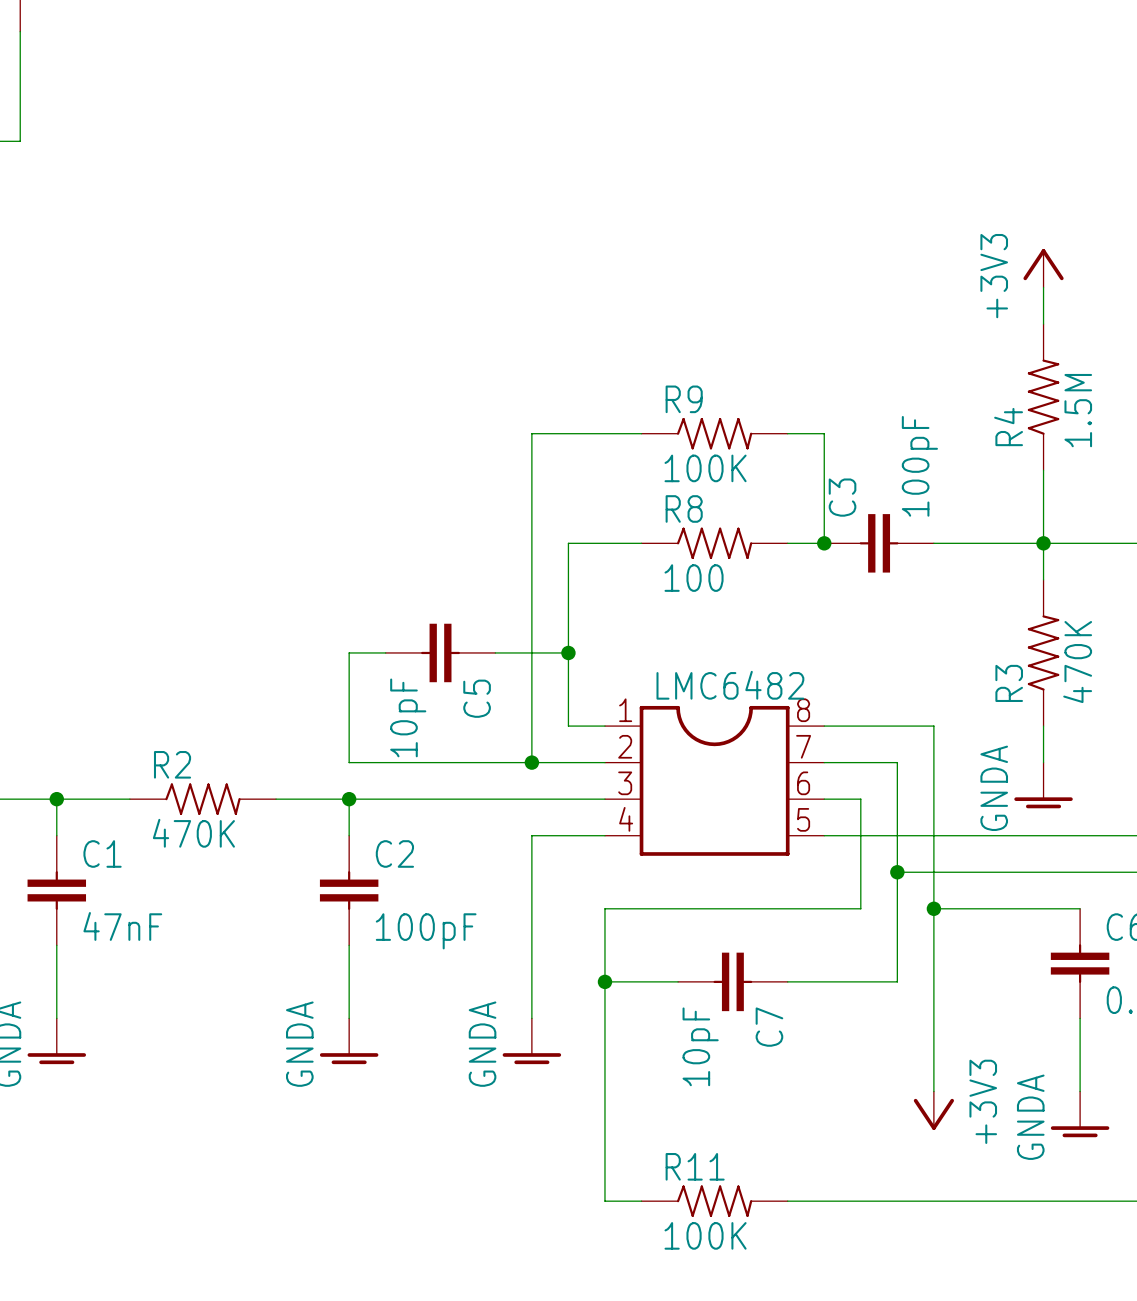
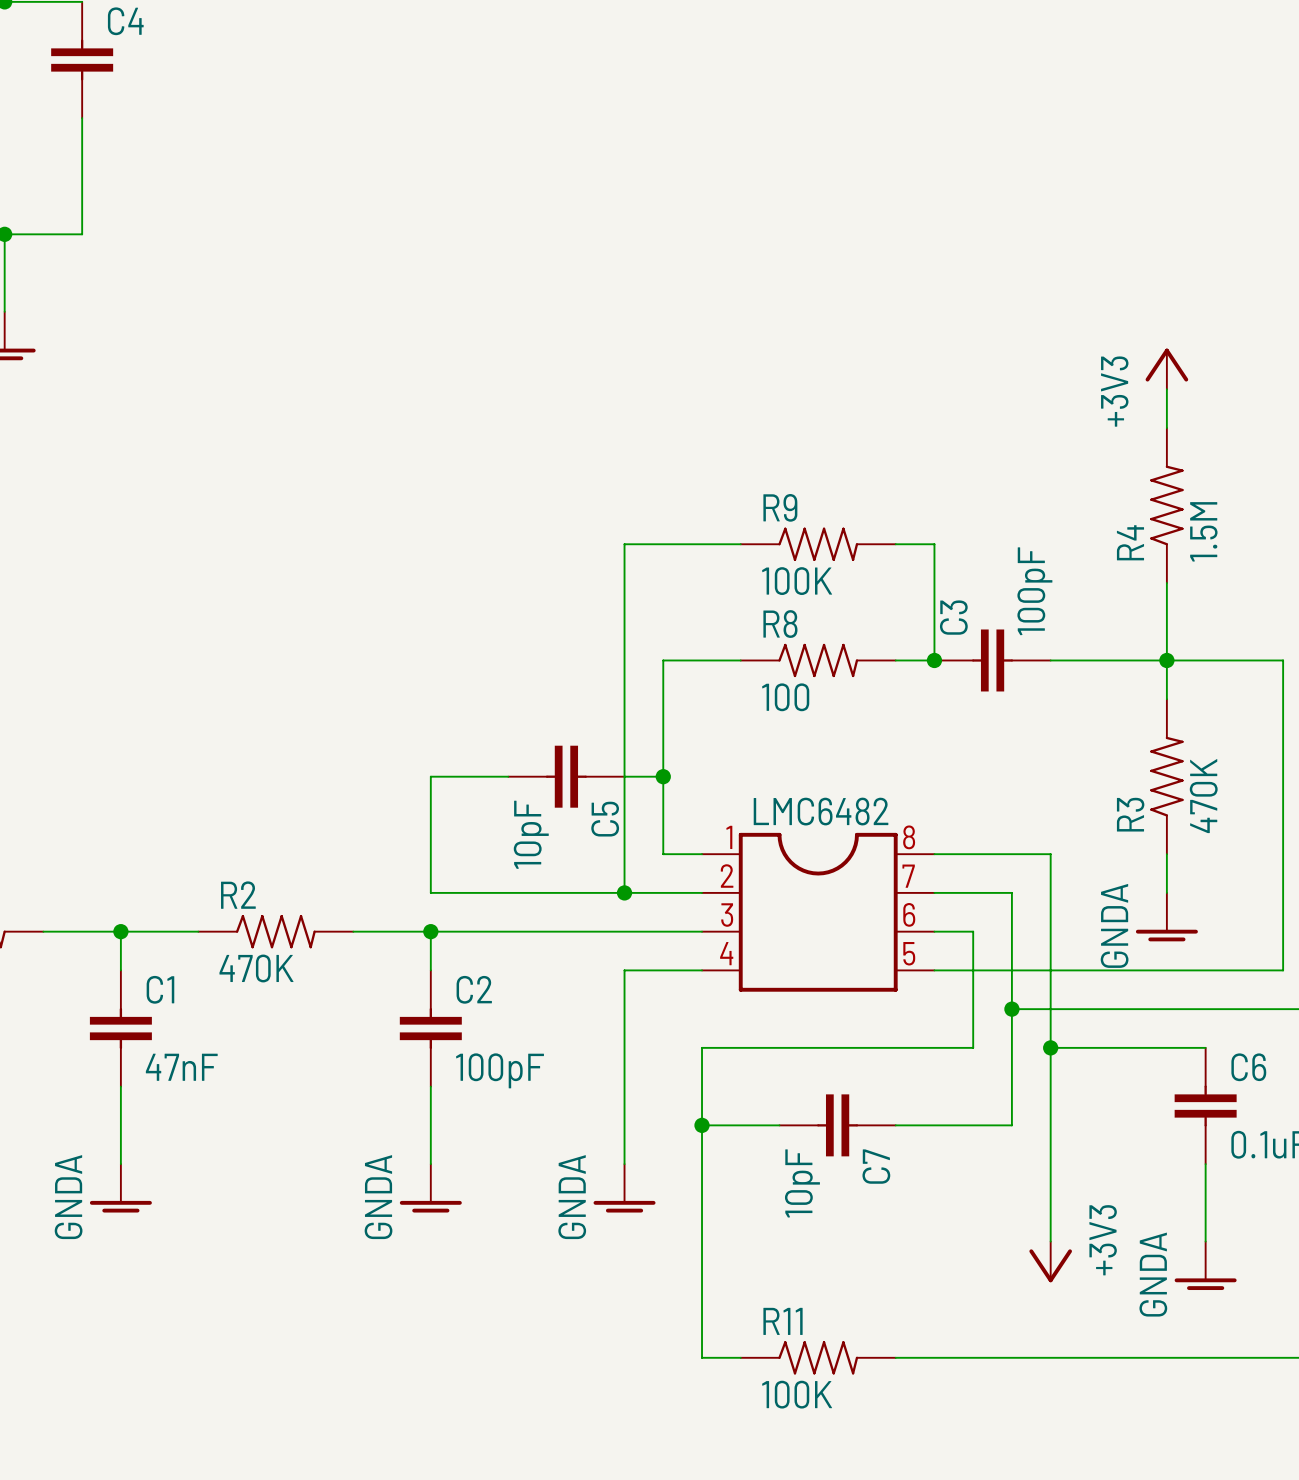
C5 position: (440, 652) -> (566, 776)

